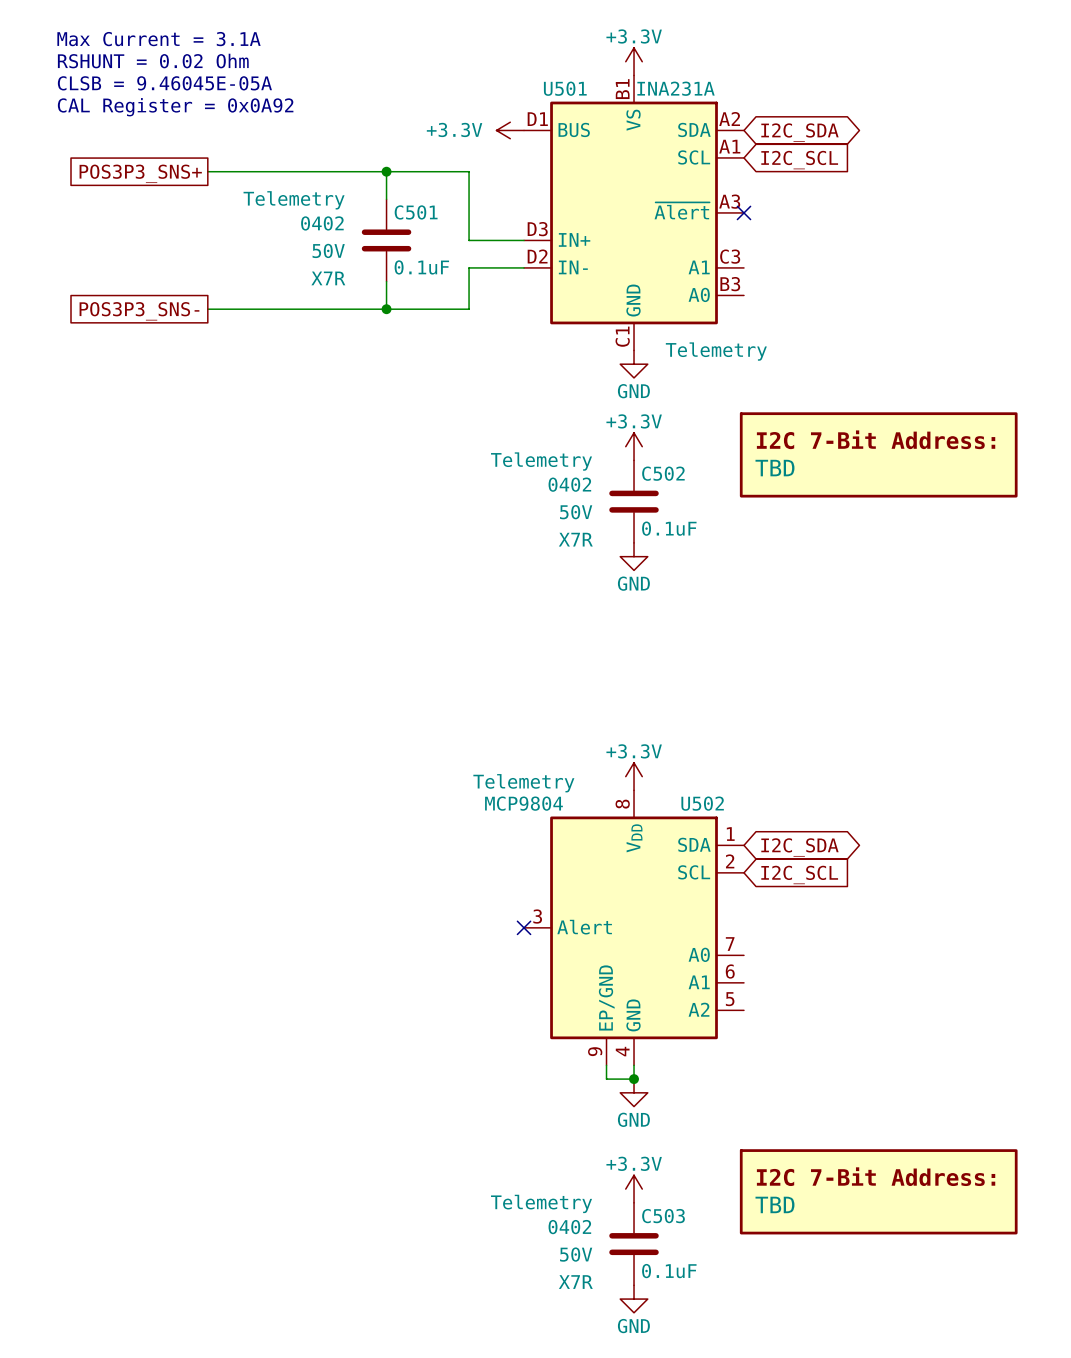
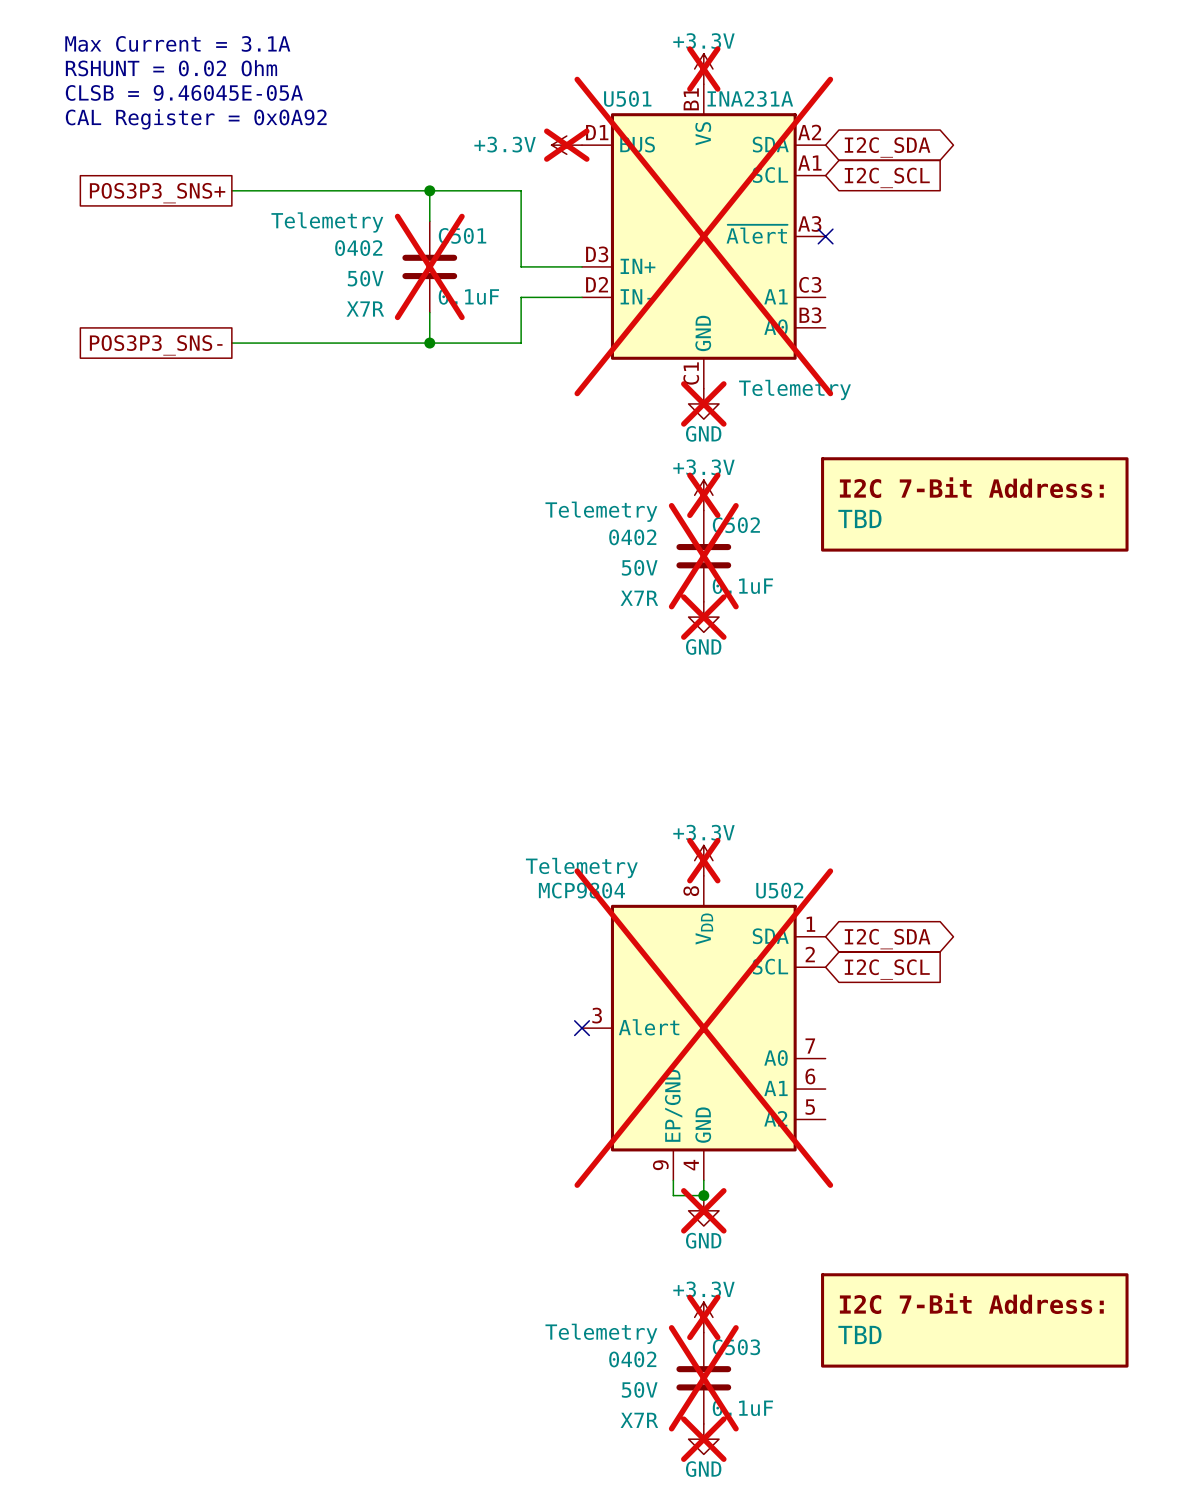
power symbol do-not-place cross: none -> (703, 69)
power symbol do-not-place cross: none -> (566, 145)
U501 do-not-place cross: none -> (703, 236)
C501 do-not-place cross: none -> (429, 266)
power symbol do-not-place cross: none -> (703, 403)
power symbol do-not-place cross: none -> (703, 495)
C502 do-not-place cross: none -> (703, 556)
power symbol do-not-place cross: none -> (703, 617)
power symbol do-not-place cross: none -> (703, 860)
U502 do-not-place cross: none -> (703, 1028)
power symbol do-not-place cross: none -> (703, 1210)
power symbol do-not-place cross: none -> (703, 1317)
C503 do-not-place cross: none -> (703, 1378)
power symbol do-not-place cross: none -> (703, 1439)

